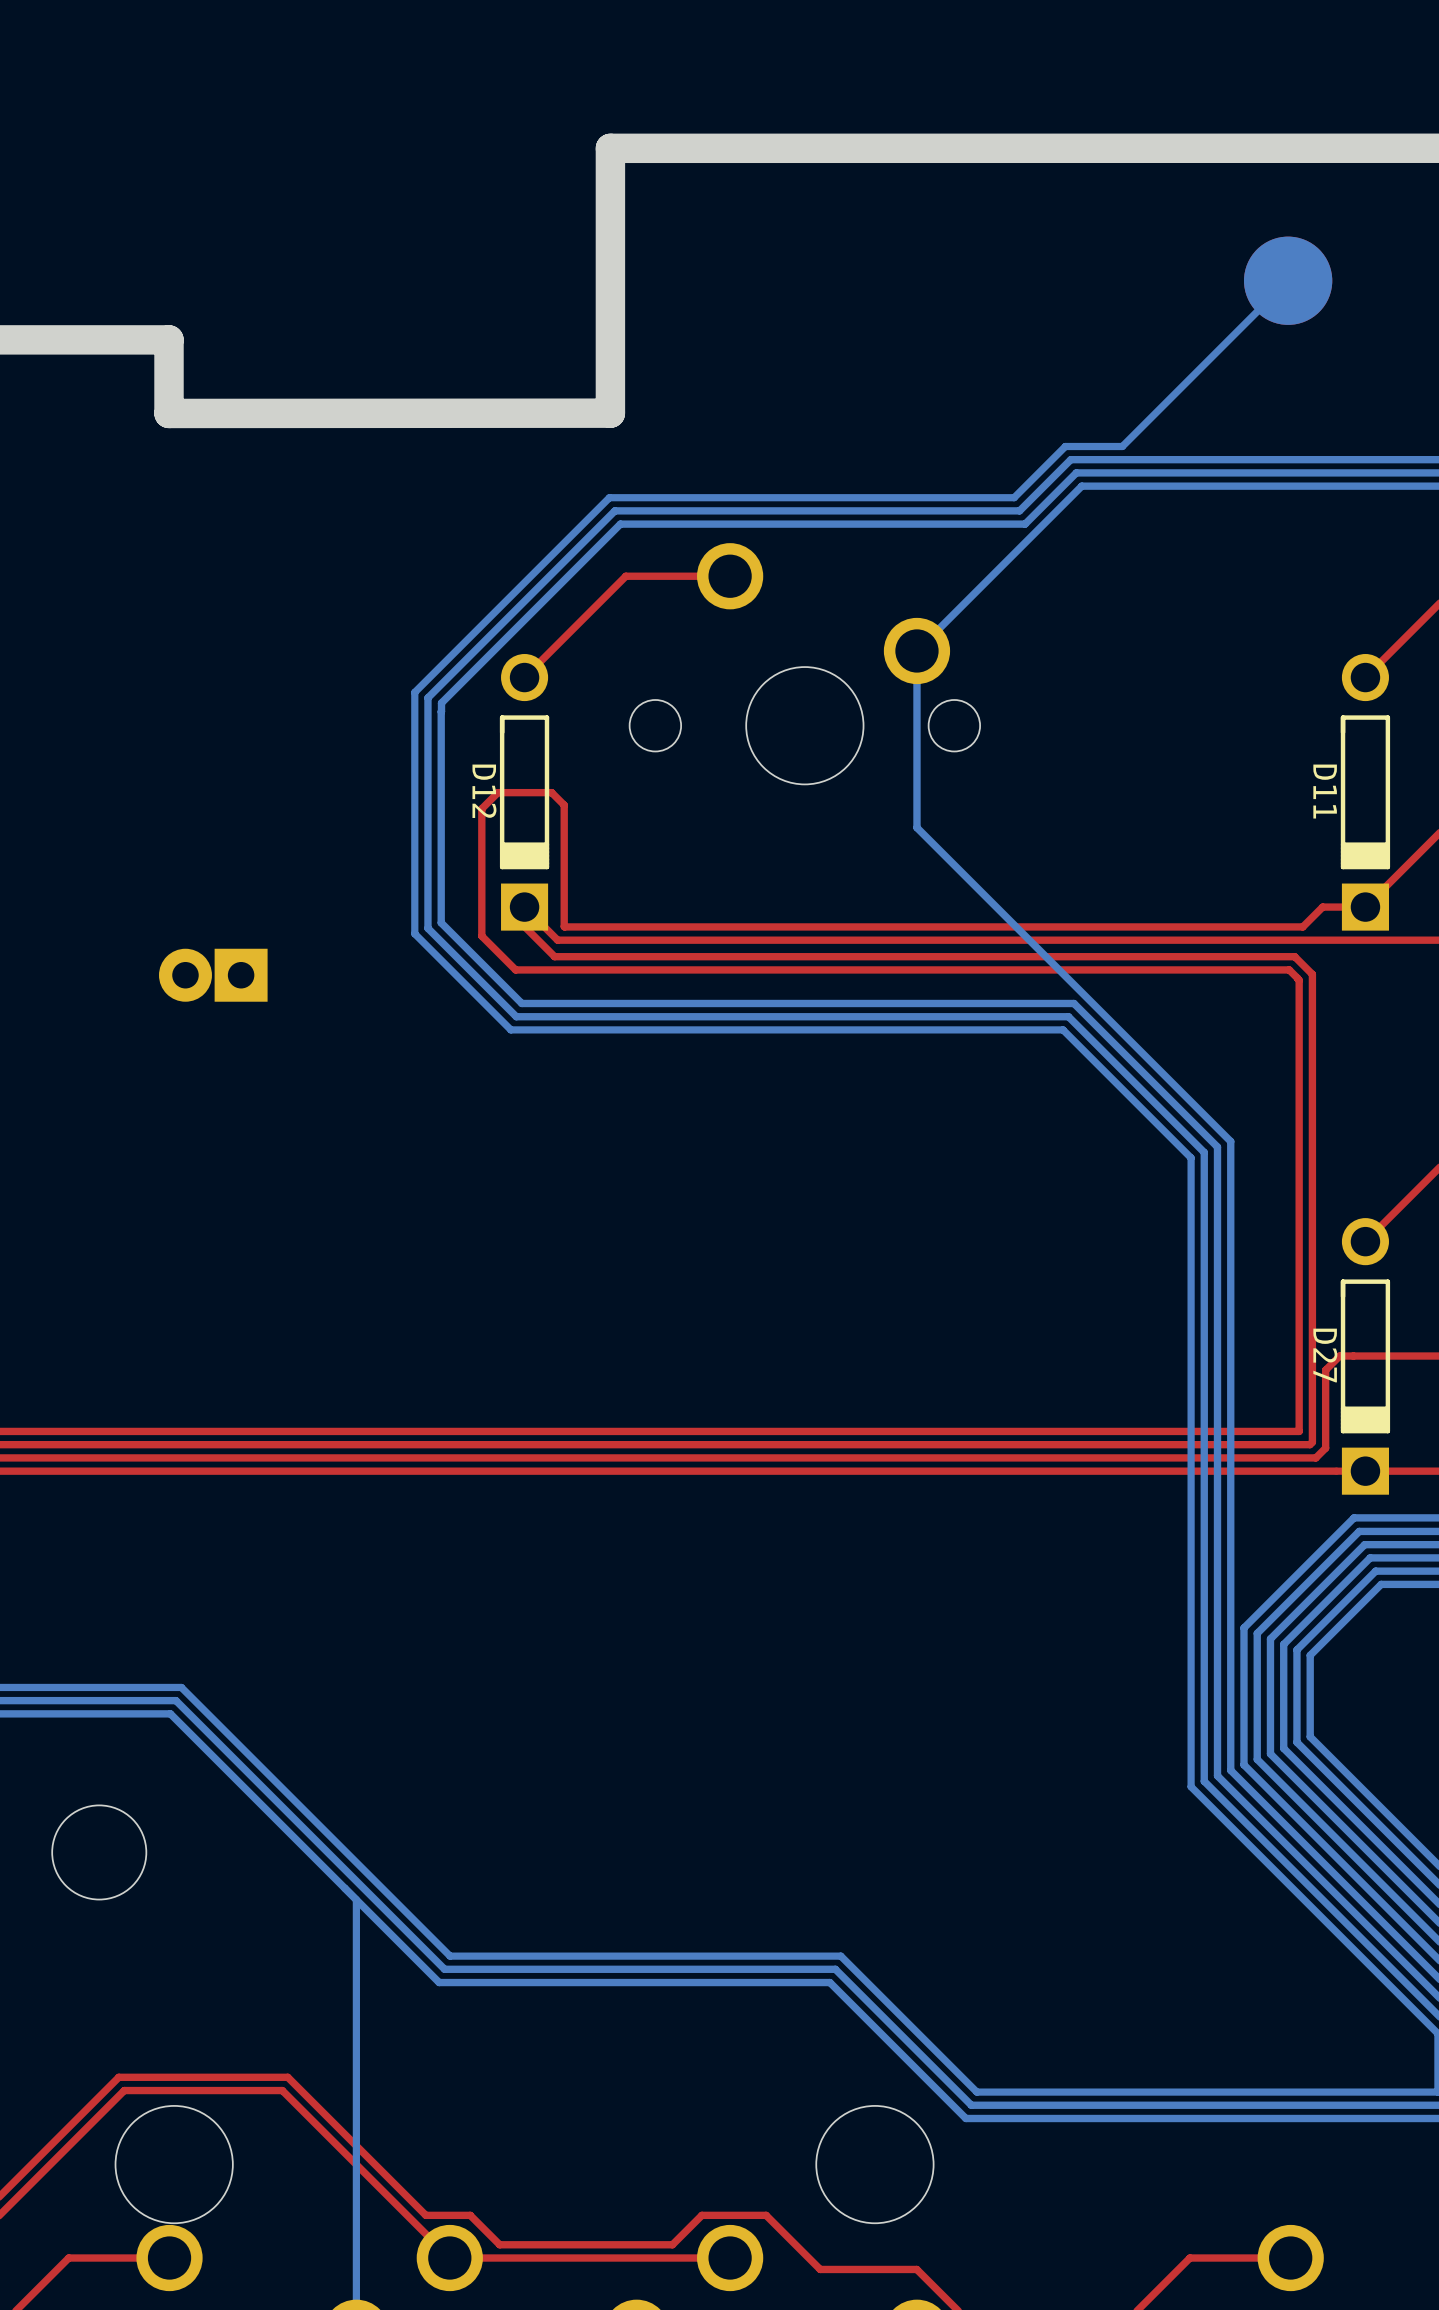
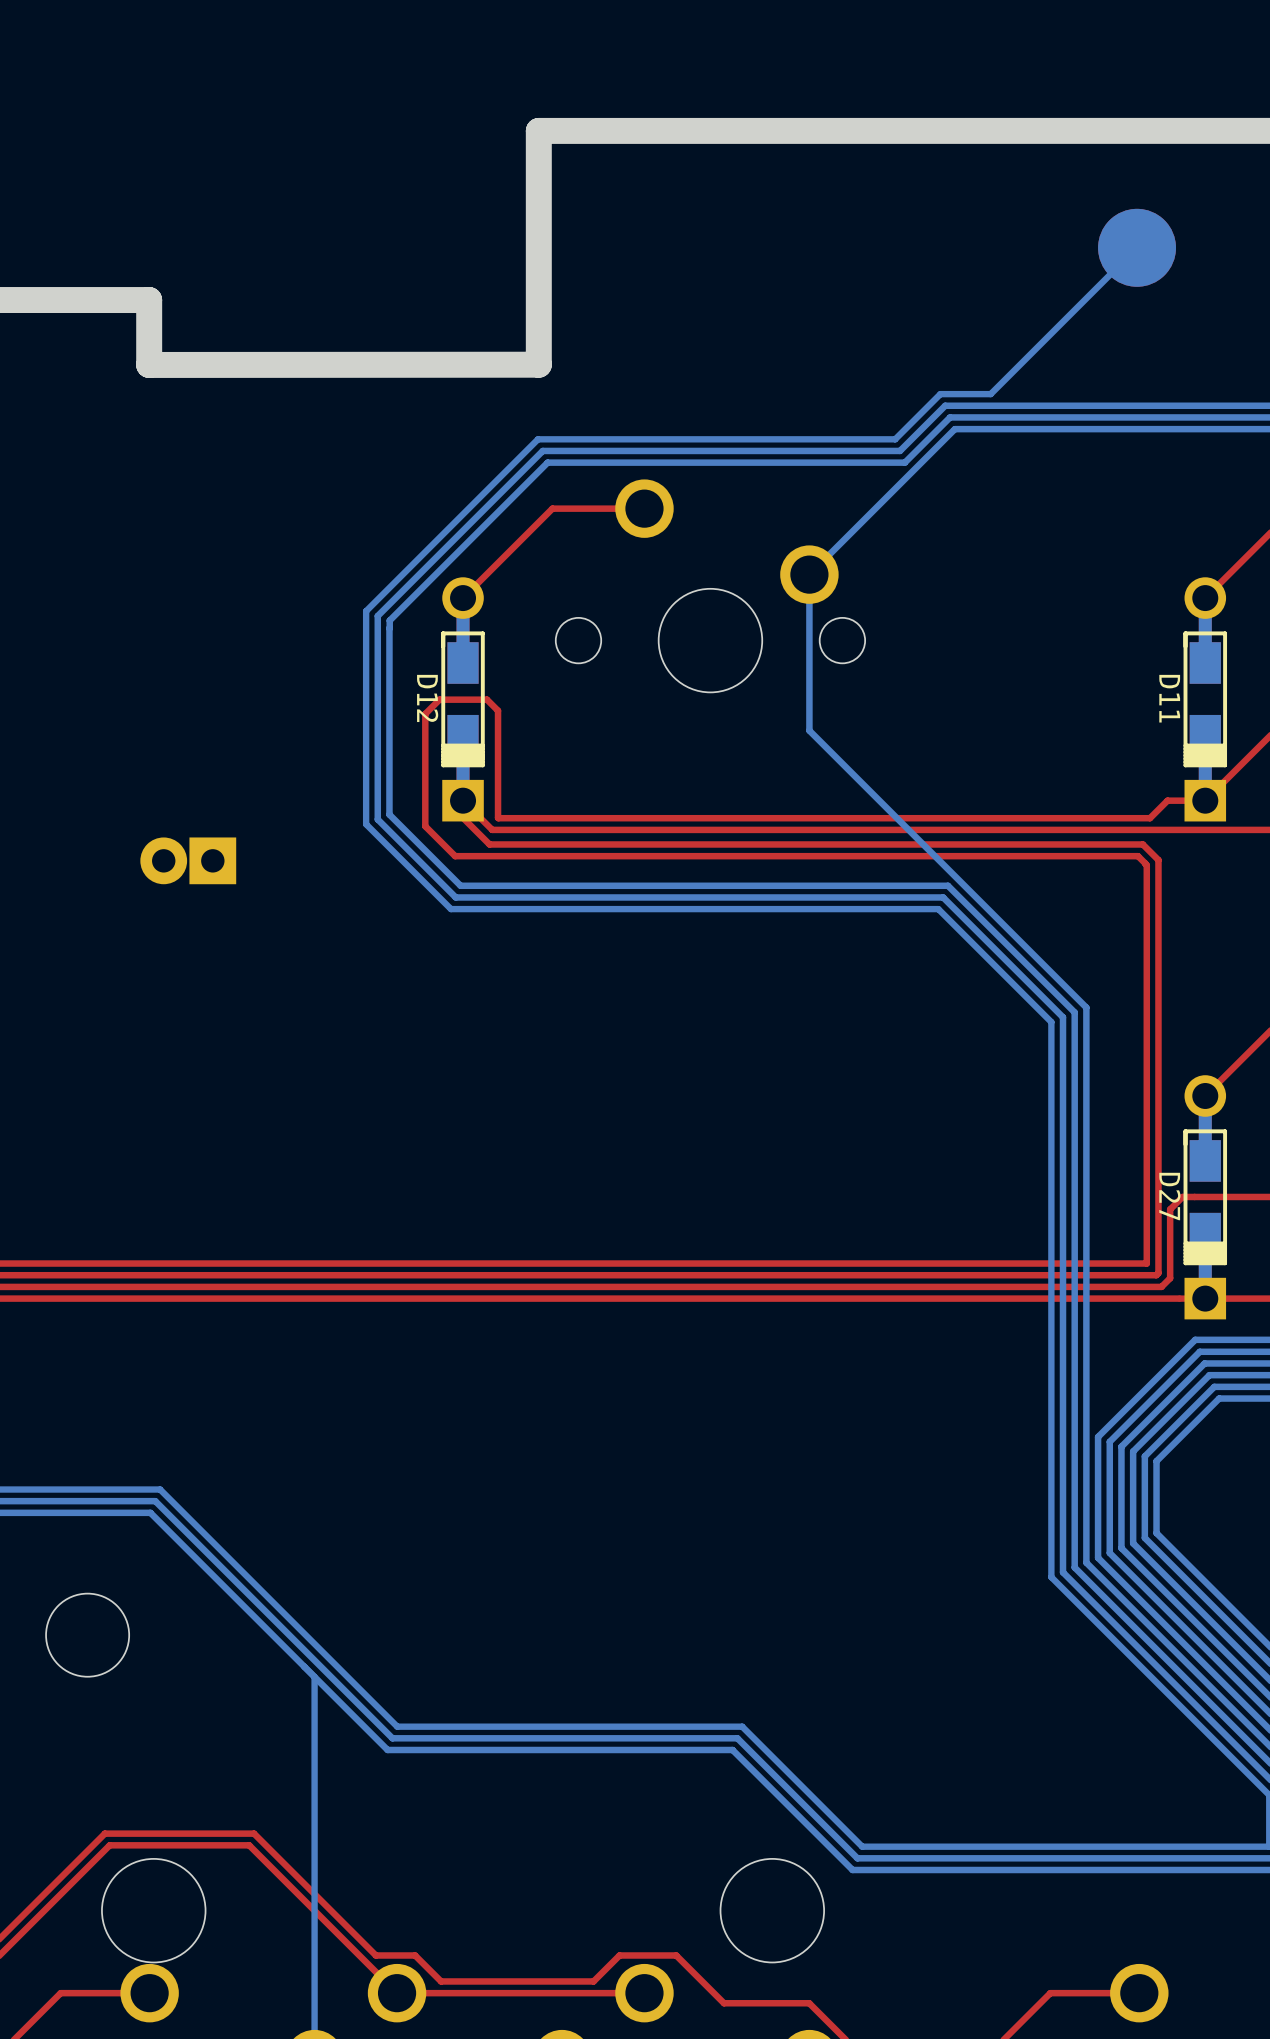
D12 footprint: [499, 654, 550, 931] -> [441, 577, 485, 822]
D11 footprint: [1340, 654, 1391, 931] -> [1183, 577, 1228, 822]
D27 footprint: [1340, 1218, 1391, 1495] -> [1183, 1075, 1228, 1320]

